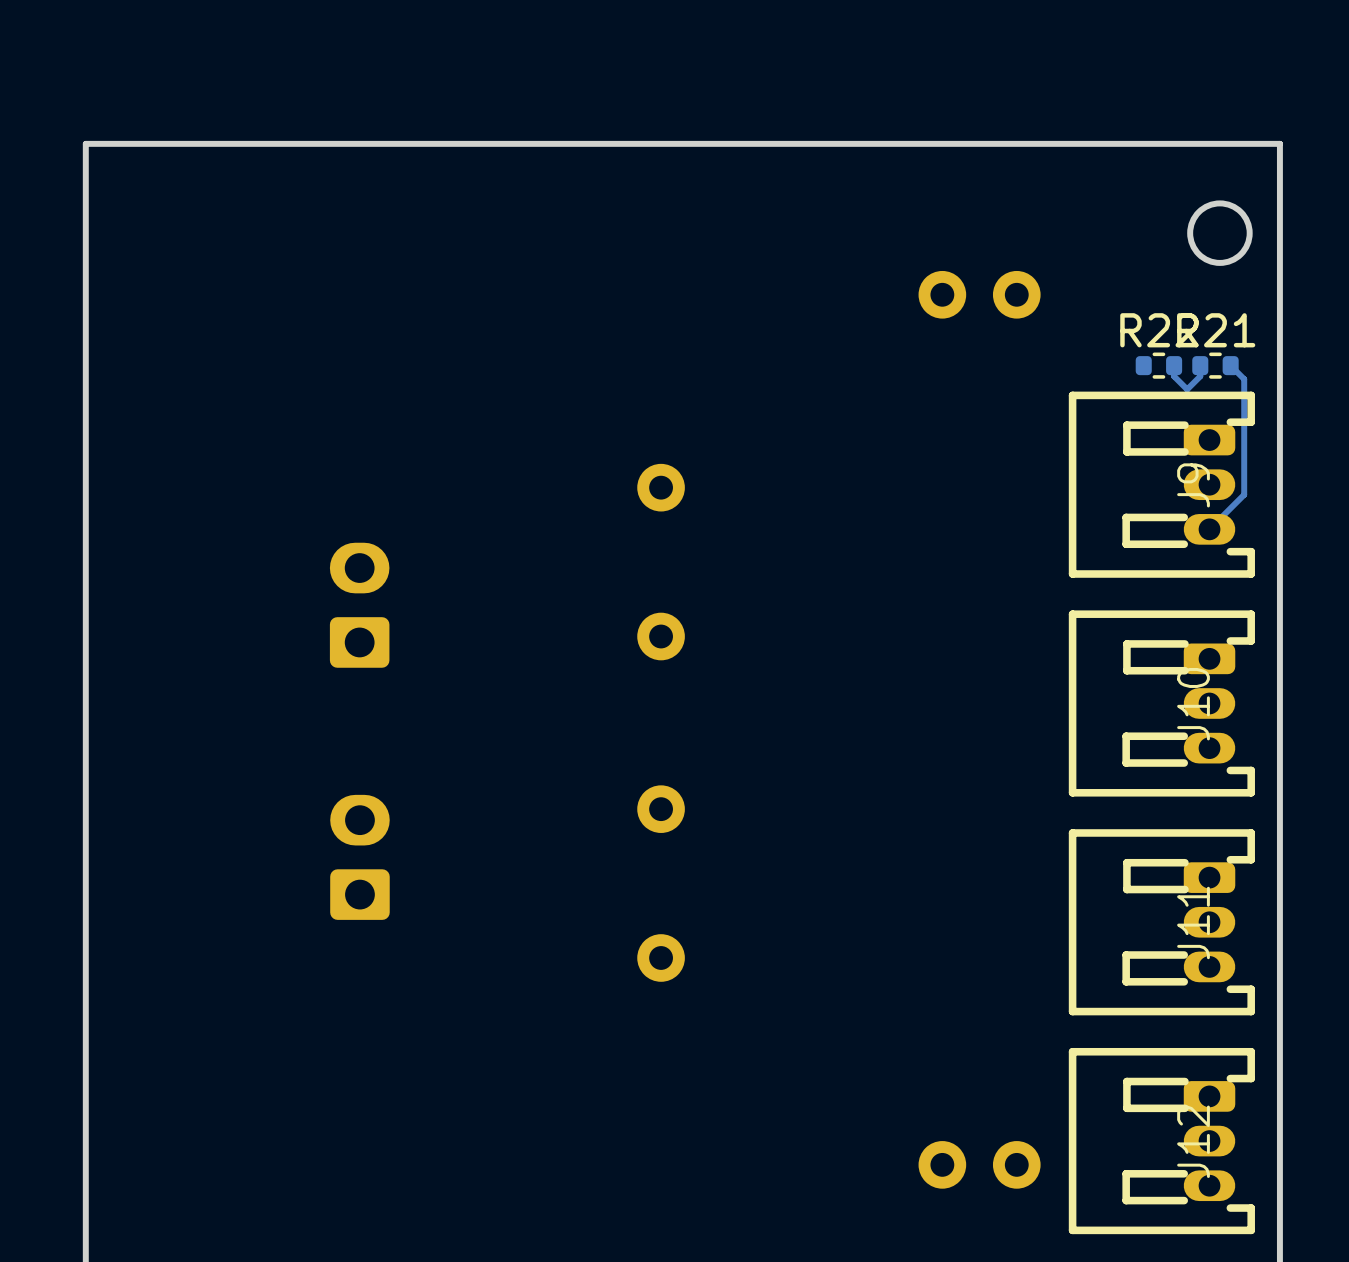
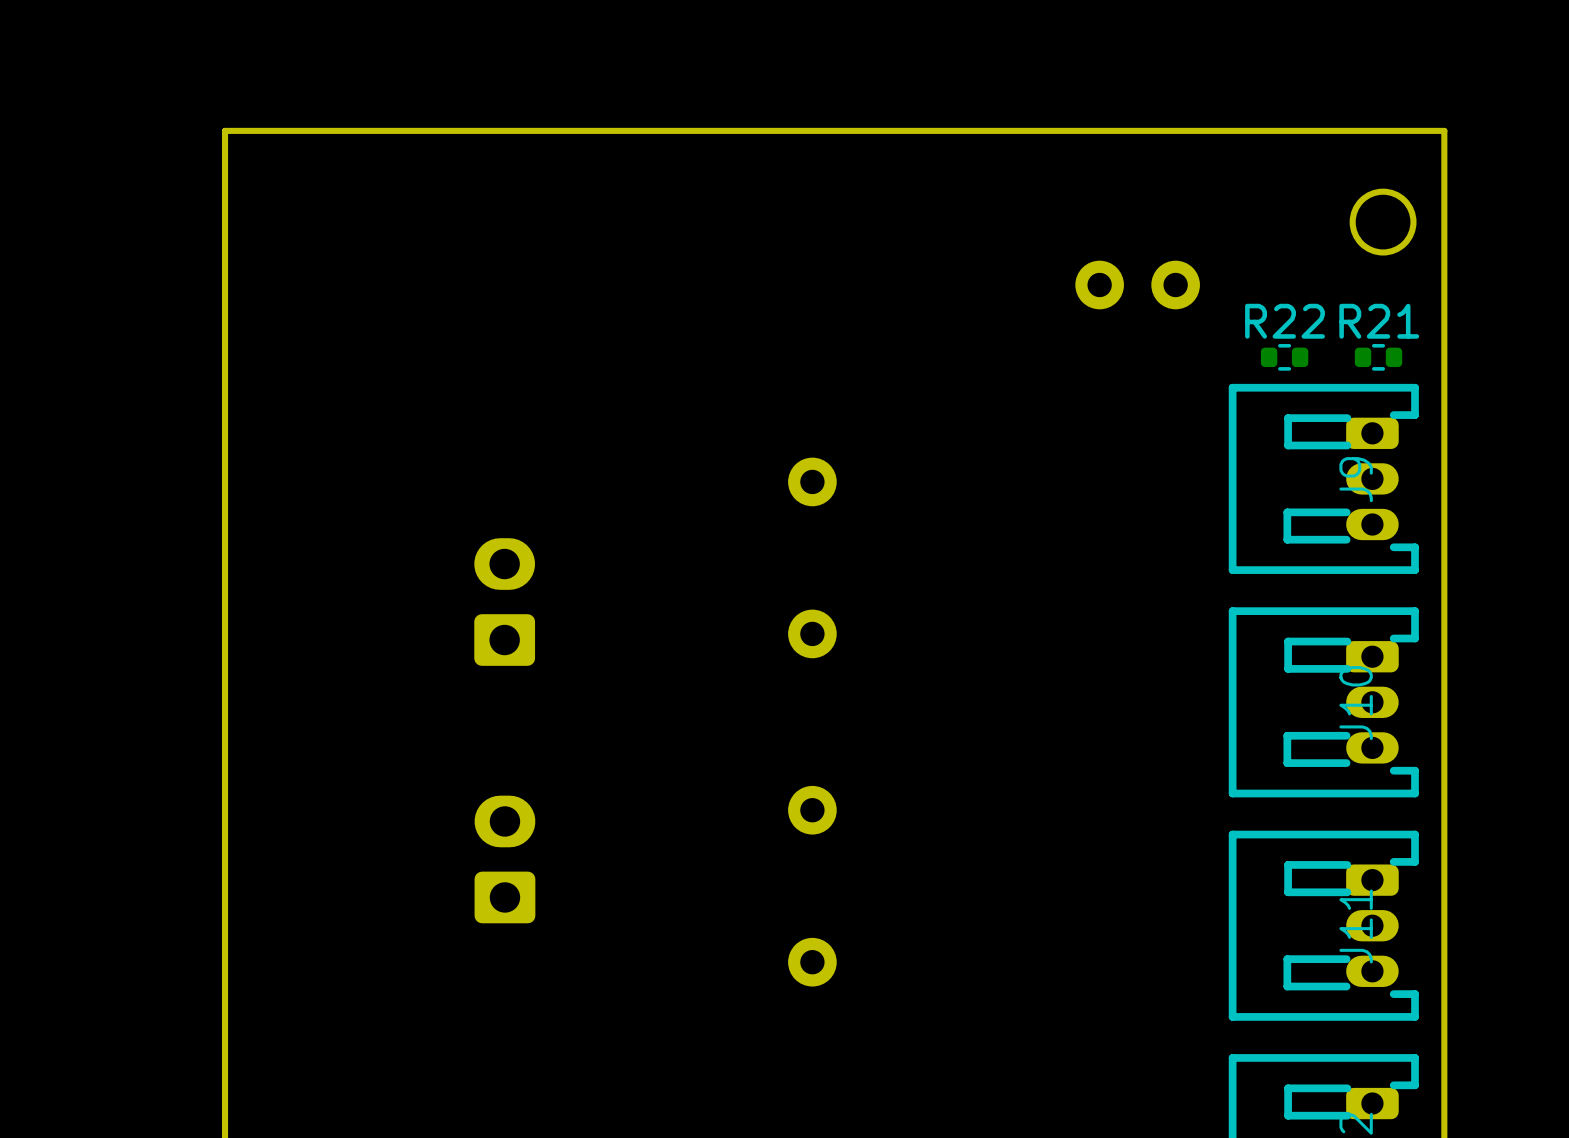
R22 position: (1158, 365) -> (1284, 357)
track: (1200, 365) (1200, 376) (1187, 389) (1174, 376) (1174, 365) -> none
track: (1230, 365) (1244, 379) (1244, 494) (1209, 529) -> none

